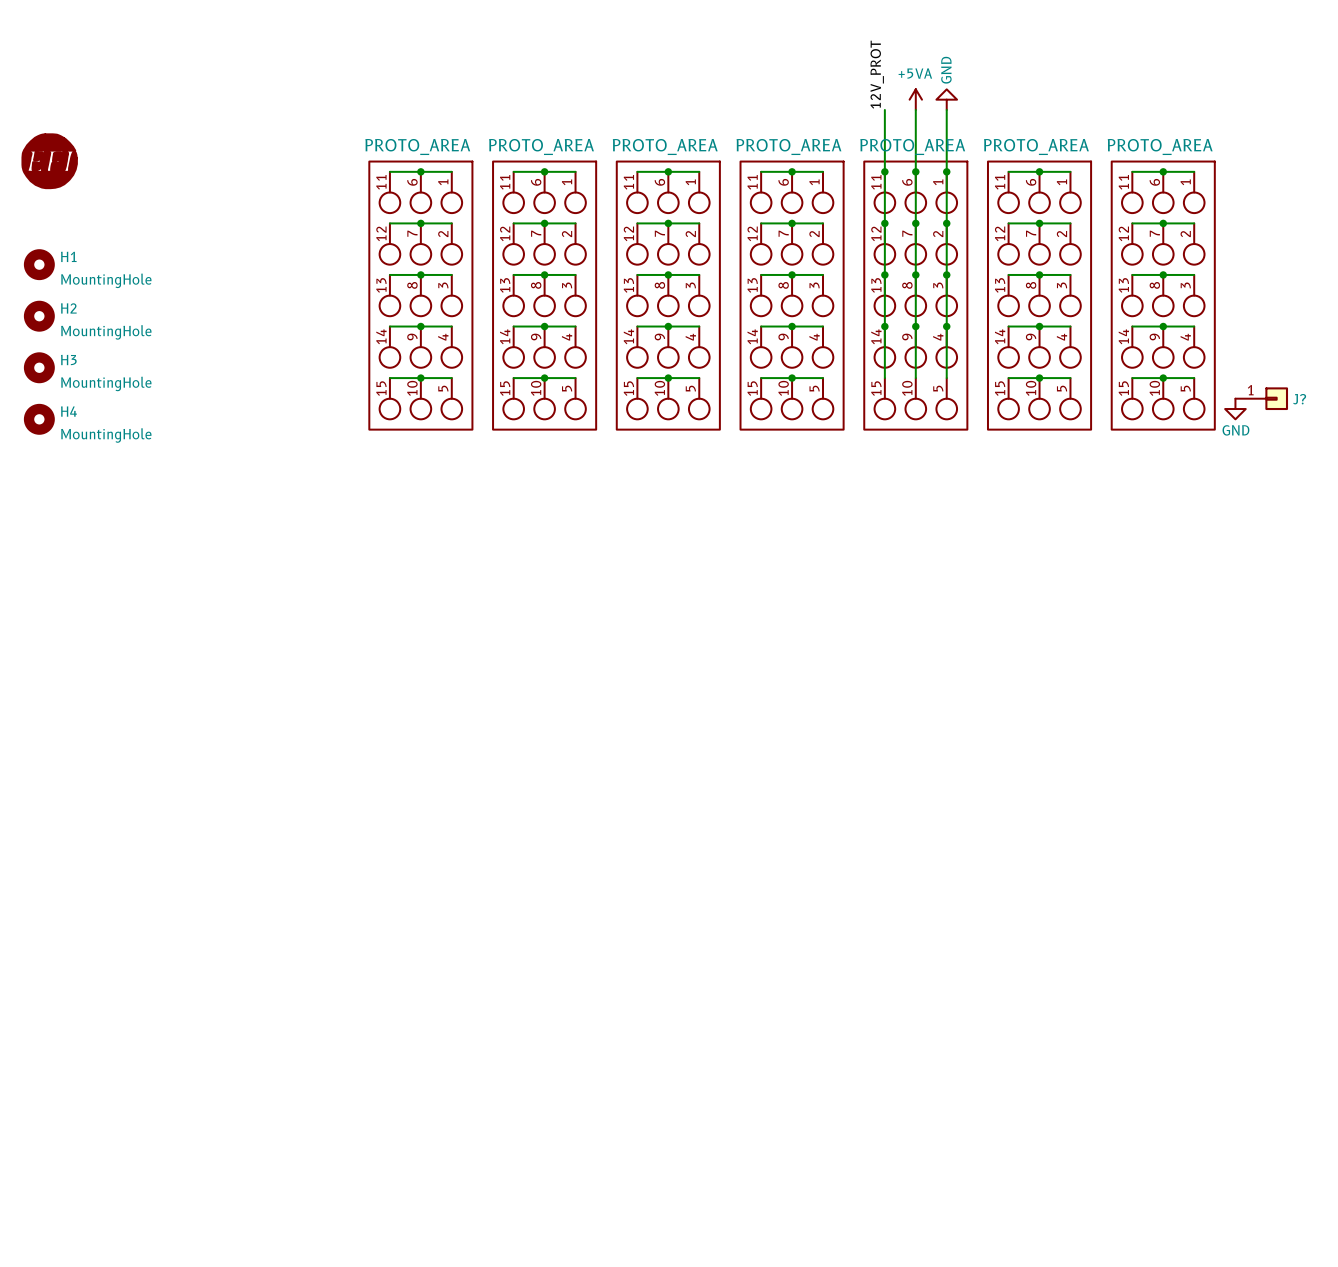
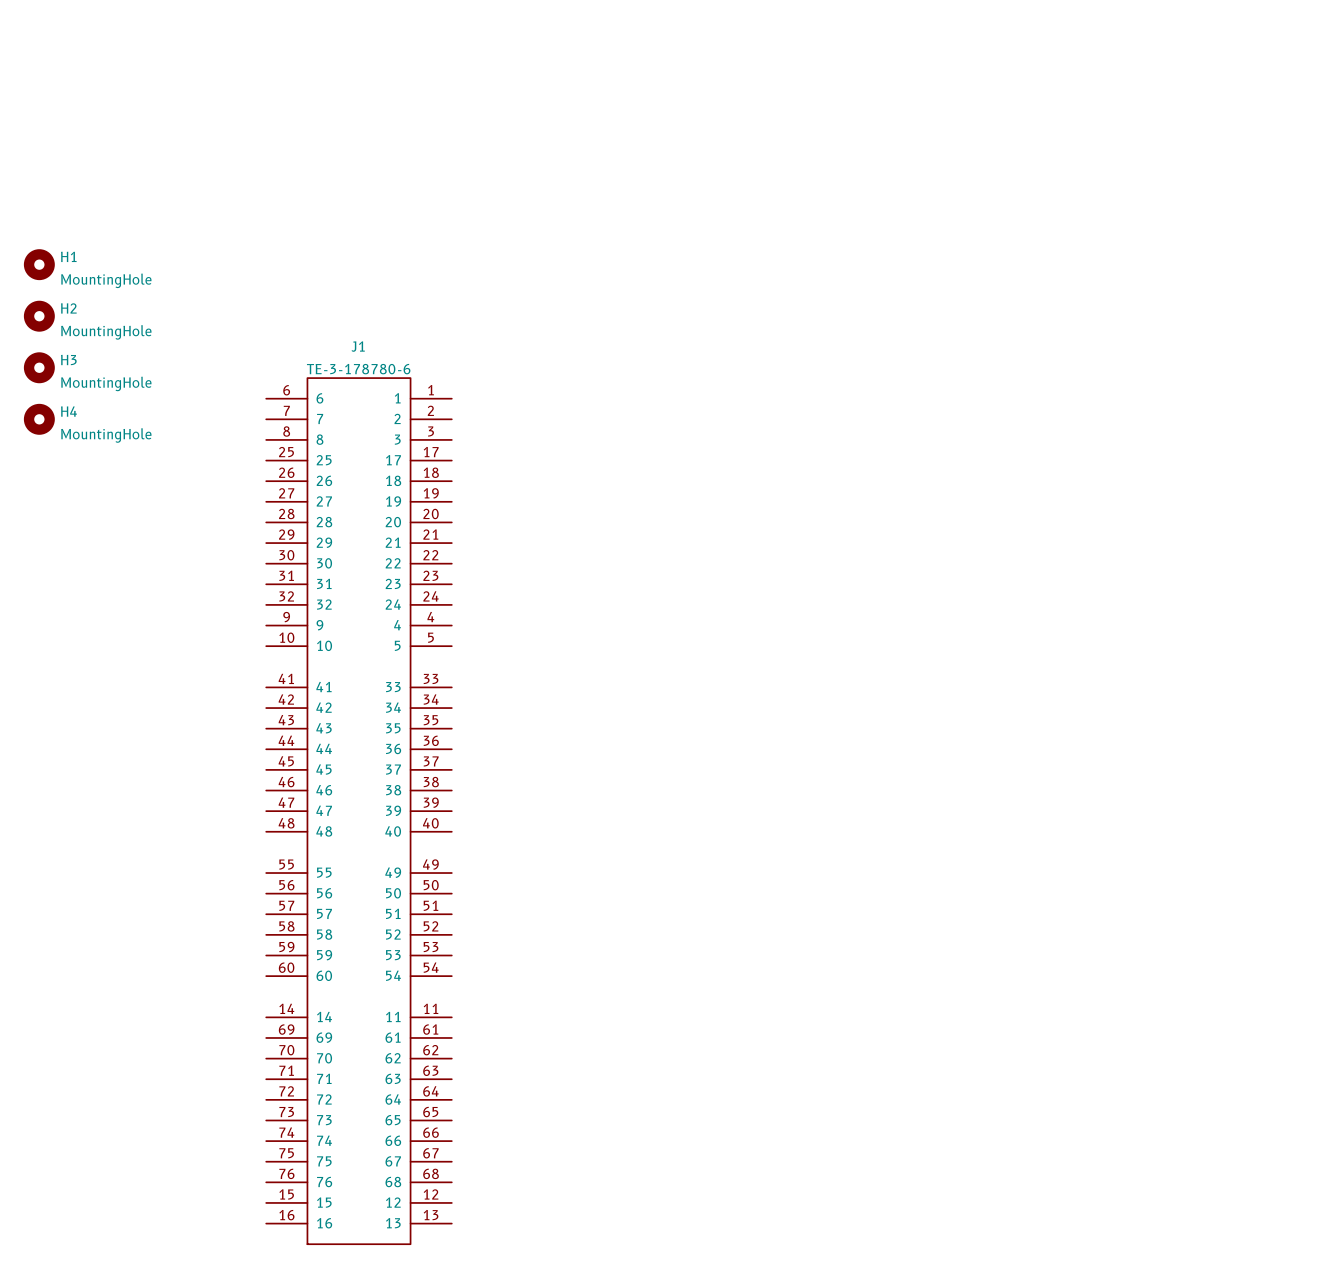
label: 12V_PROT (877, 74) -> none
power symbol: +5VA (915, 99) -> none
power symbol: GND (946, 99) -> none
wire: (884, 109) (884, 378) -> none
wire: (915, 109) (915, 378) -> none
wire: (946, 109) (946, 378) -> none
part: (49, 161) -> none
wire: (389, 171) (451, 171) -> none
junction: (420, 171) -> none
wire: (513, 171) (575, 171) -> none
junction: (544, 171) -> none
wire: (637, 171) (699, 171) -> none
junction: (668, 171) -> none
wire: (761, 171) (823, 171) -> none
junction: (792, 171) -> none
junction: (884, 171) -> none
junction: (915, 171) -> none
junction: (946, 171) -> none
wire: (1008, 171) (1070, 171) -> none
junction: (1039, 171) -> none
wire: (1132, 171) (1194, 171) -> none
junction: (1163, 171) -> none
wire: (389, 223) (451, 223) -> none
junction: (420, 223) -> none
wire: (513, 223) (575, 223) -> none
junction: (544, 223) -> none
wire: (637, 223) (699, 223) -> none
junction: (668, 223) -> none
wire: (761, 223) (823, 223) -> none
junction: (792, 223) -> none
junction: (884, 223) -> none
junction: (915, 223) -> none
junction: (946, 223) -> none
wire: (1008, 223) (1070, 223) -> none
junction: (1039, 223) -> none
wire: (1132, 223) (1194, 223) -> none
junction: (1163, 223) -> none
wire: (389, 274) (451, 274) -> none
junction: (420, 274) -> none
wire: (513, 274) (575, 274) -> none
junction: (544, 274) -> none
wire: (637, 274) (699, 274) -> none
junction: (668, 274) -> none
wire: (761, 274) (823, 274) -> none
junction: (792, 274) -> none
junction: (884, 274) -> none
junction: (915, 274) -> none
junction: (946, 274) -> none
wire: (1008, 274) (1070, 274) -> none
junction: (1039, 274) -> none
wire: (1132, 274) (1194, 274) -> none
junction: (1163, 274) -> none
part: PROTO_AREA (420, 295) -> none
part: PROTO_AREA (544, 295) -> none
part: PROTO_AREA (668, 295) -> none
part: PROTO_AREA (792, 295) -> none
part: PROTO_AREA (915, 295) -> none
part: PROTO_AREA (1039, 295) -> none
part: PROTO_AREA (1163, 295) -> none
wire: (389, 326) (451, 326) -> none
junction: (420, 326) -> none
wire: (513, 326) (575, 326) -> none
junction: (544, 326) -> none
wire: (637, 326) (699, 326) -> none
junction: (668, 326) -> none
wire: (761, 326) (823, 326) -> none
junction: (792, 326) -> none
junction: (884, 326) -> none
junction: (915, 326) -> none
junction: (946, 326) -> none
wire: (1008, 326) (1070, 326) -> none
junction: (1039, 326) -> none
wire: (1132, 326) (1194, 326) -> none
junction: (1163, 326) -> none
wire: (389, 378) (451, 378) -> none
junction: (420, 378) -> none
wire: (513, 378) (575, 378) -> none
junction: (544, 378) -> none
wire: (637, 378) (699, 378) -> none
junction: (668, 378) -> none
wire: (761, 378) (823, 378) -> none
junction: (792, 378) -> none
wire: (1008, 378) (1070, 378) -> none
junction: (1039, 378) -> none
wire: (1132, 378) (1194, 378) -> none
junction: (1163, 378) -> none
J?: (1261, 398) -> none
power symbol: GND (1235, 409) -> none
J1: none -> TE-3-178780-6 (359, 811)

